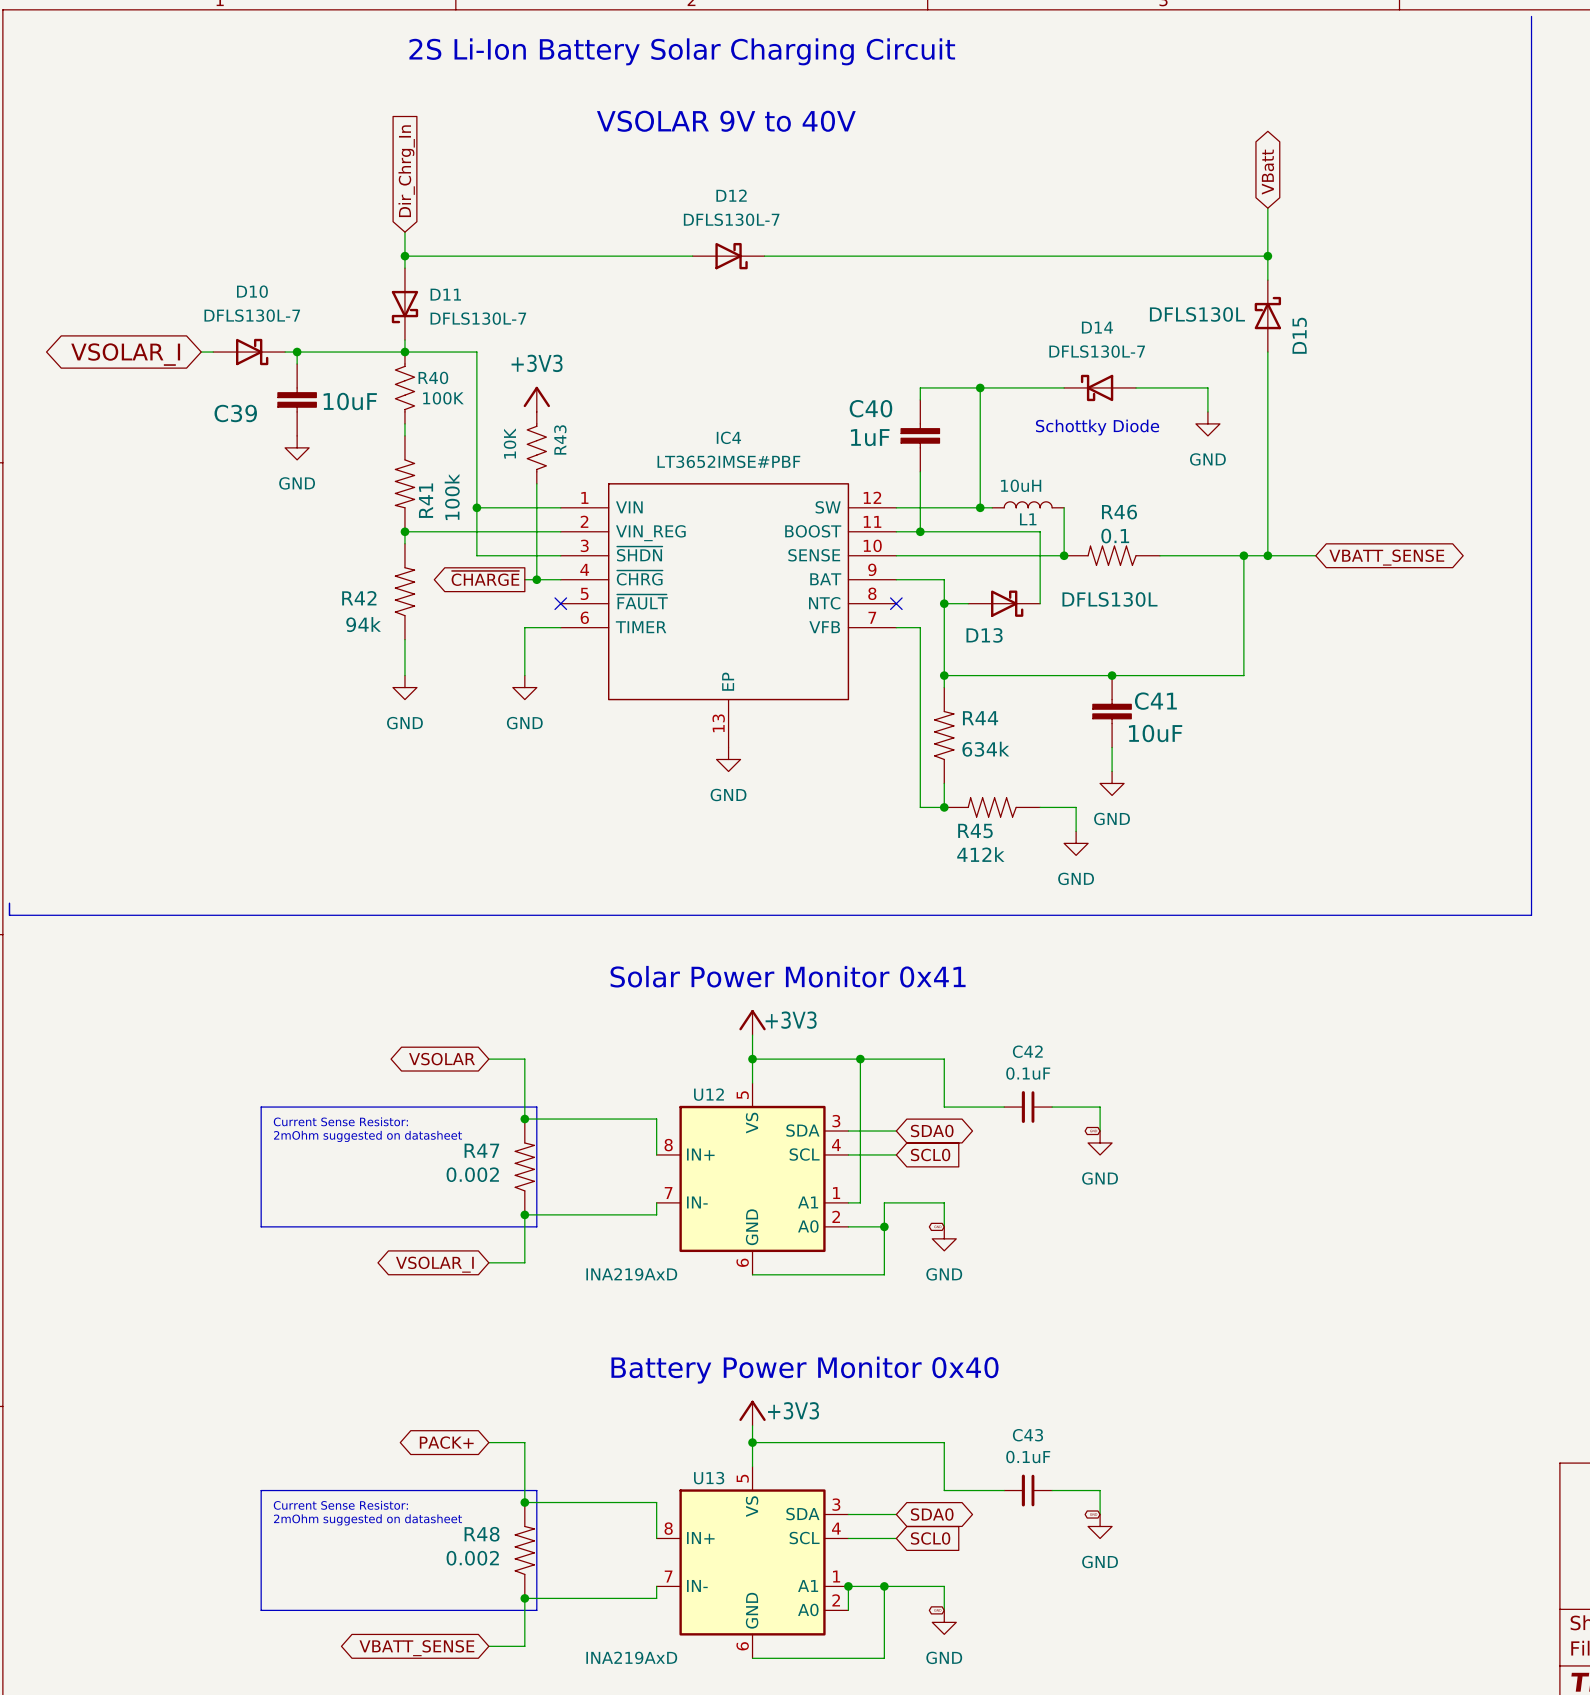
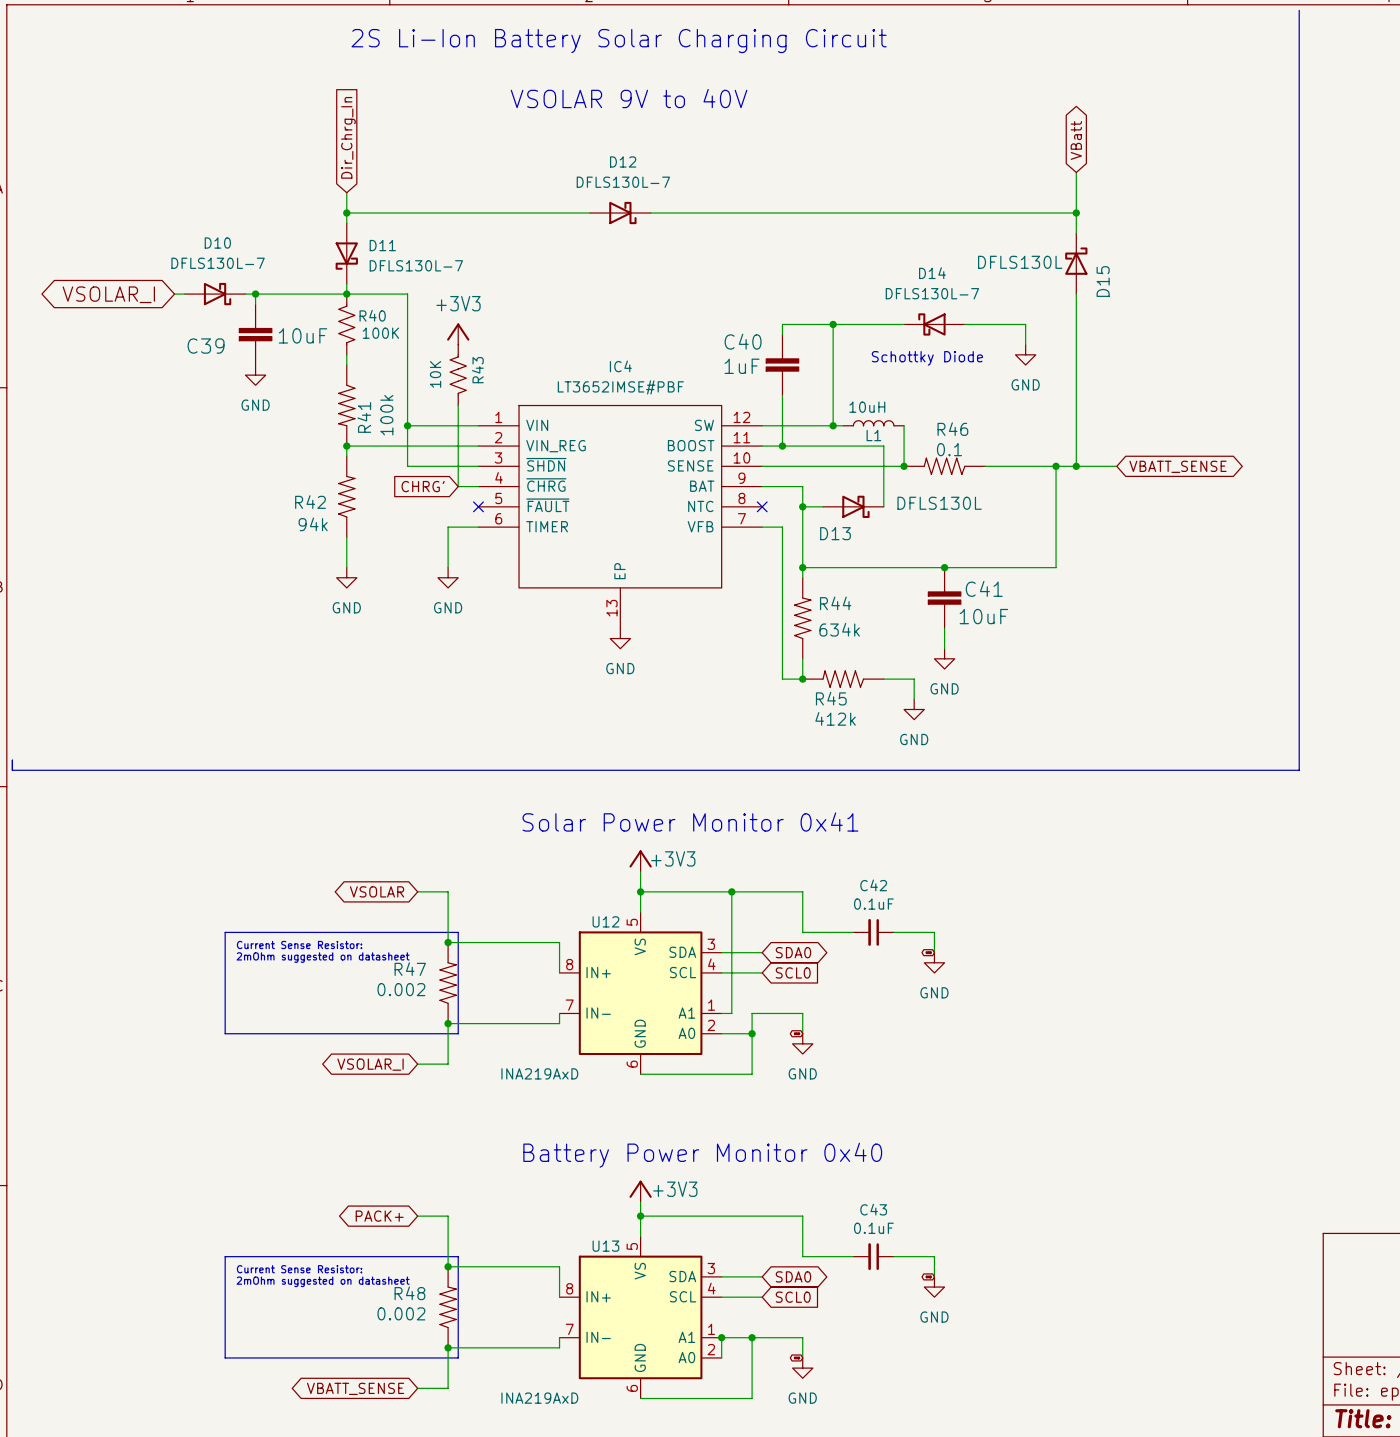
global label: ~{CHARGE} (485, 578) -> none
global label: none -> CHRG' (423, 486)
wire: (524, 579) (536, 579) -> none
junction: (536, 579) -> none

